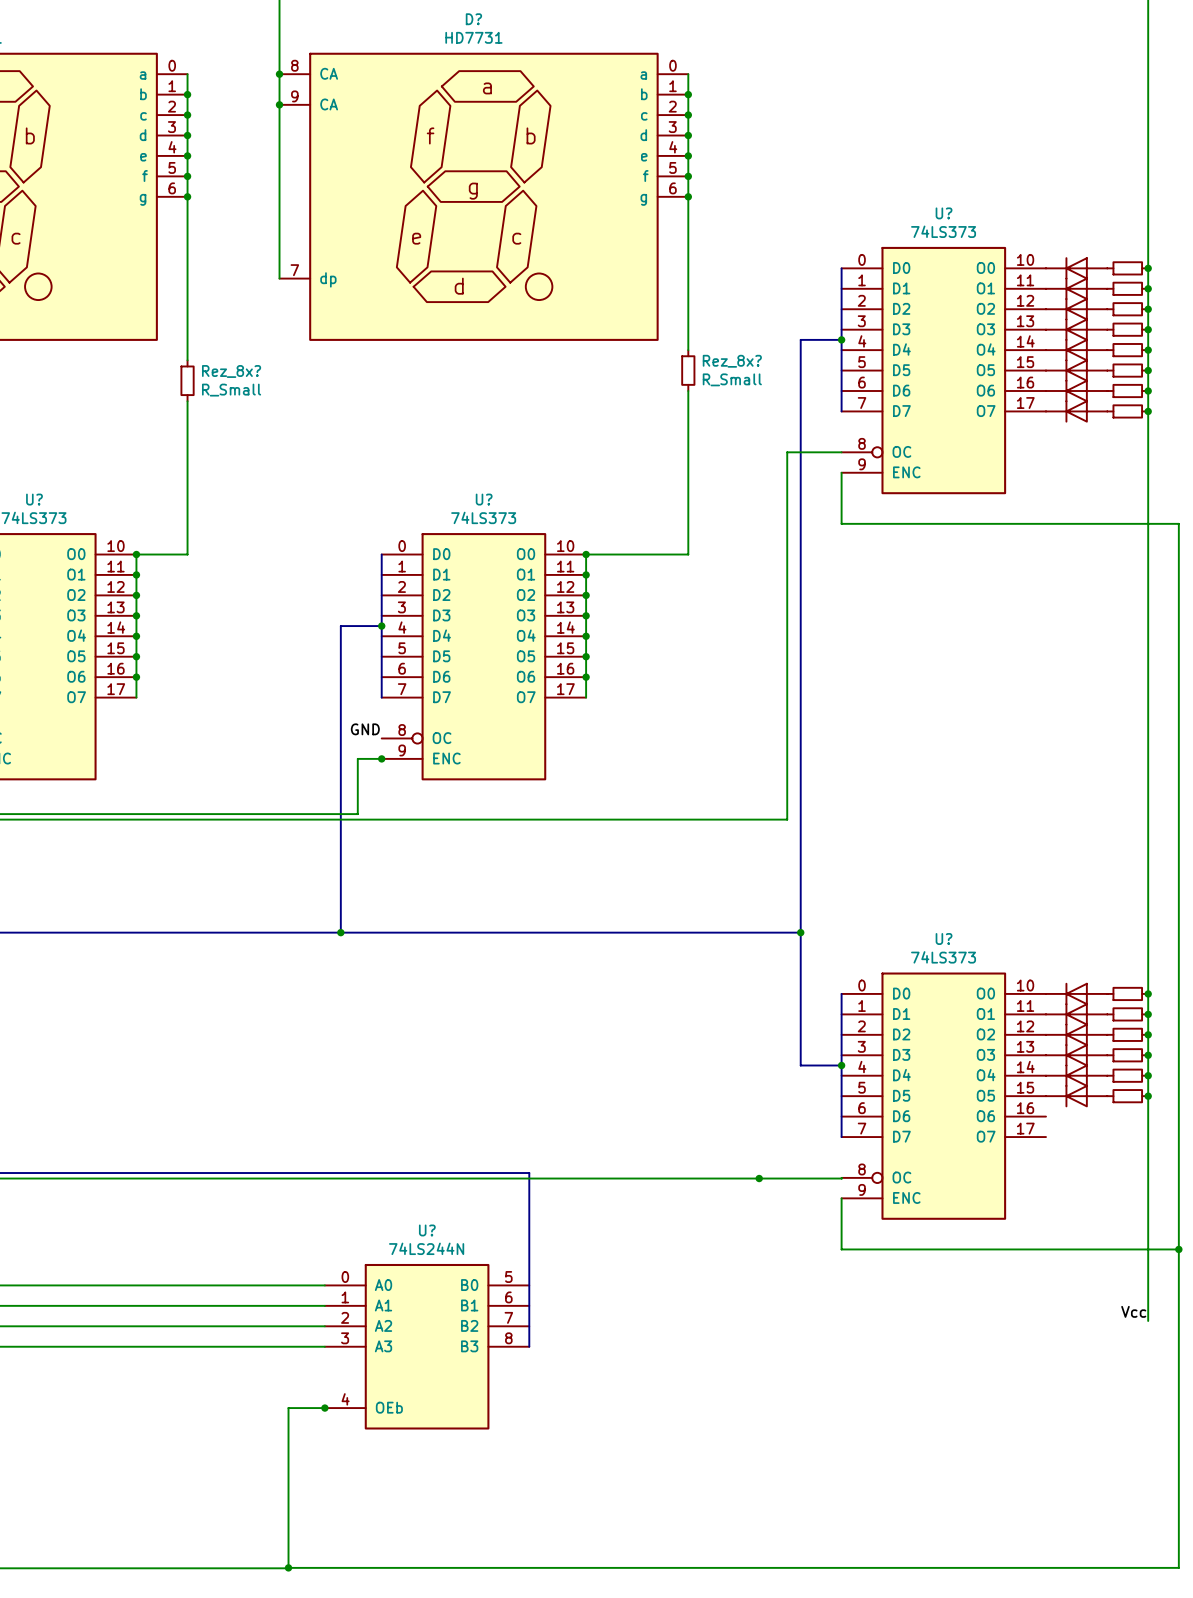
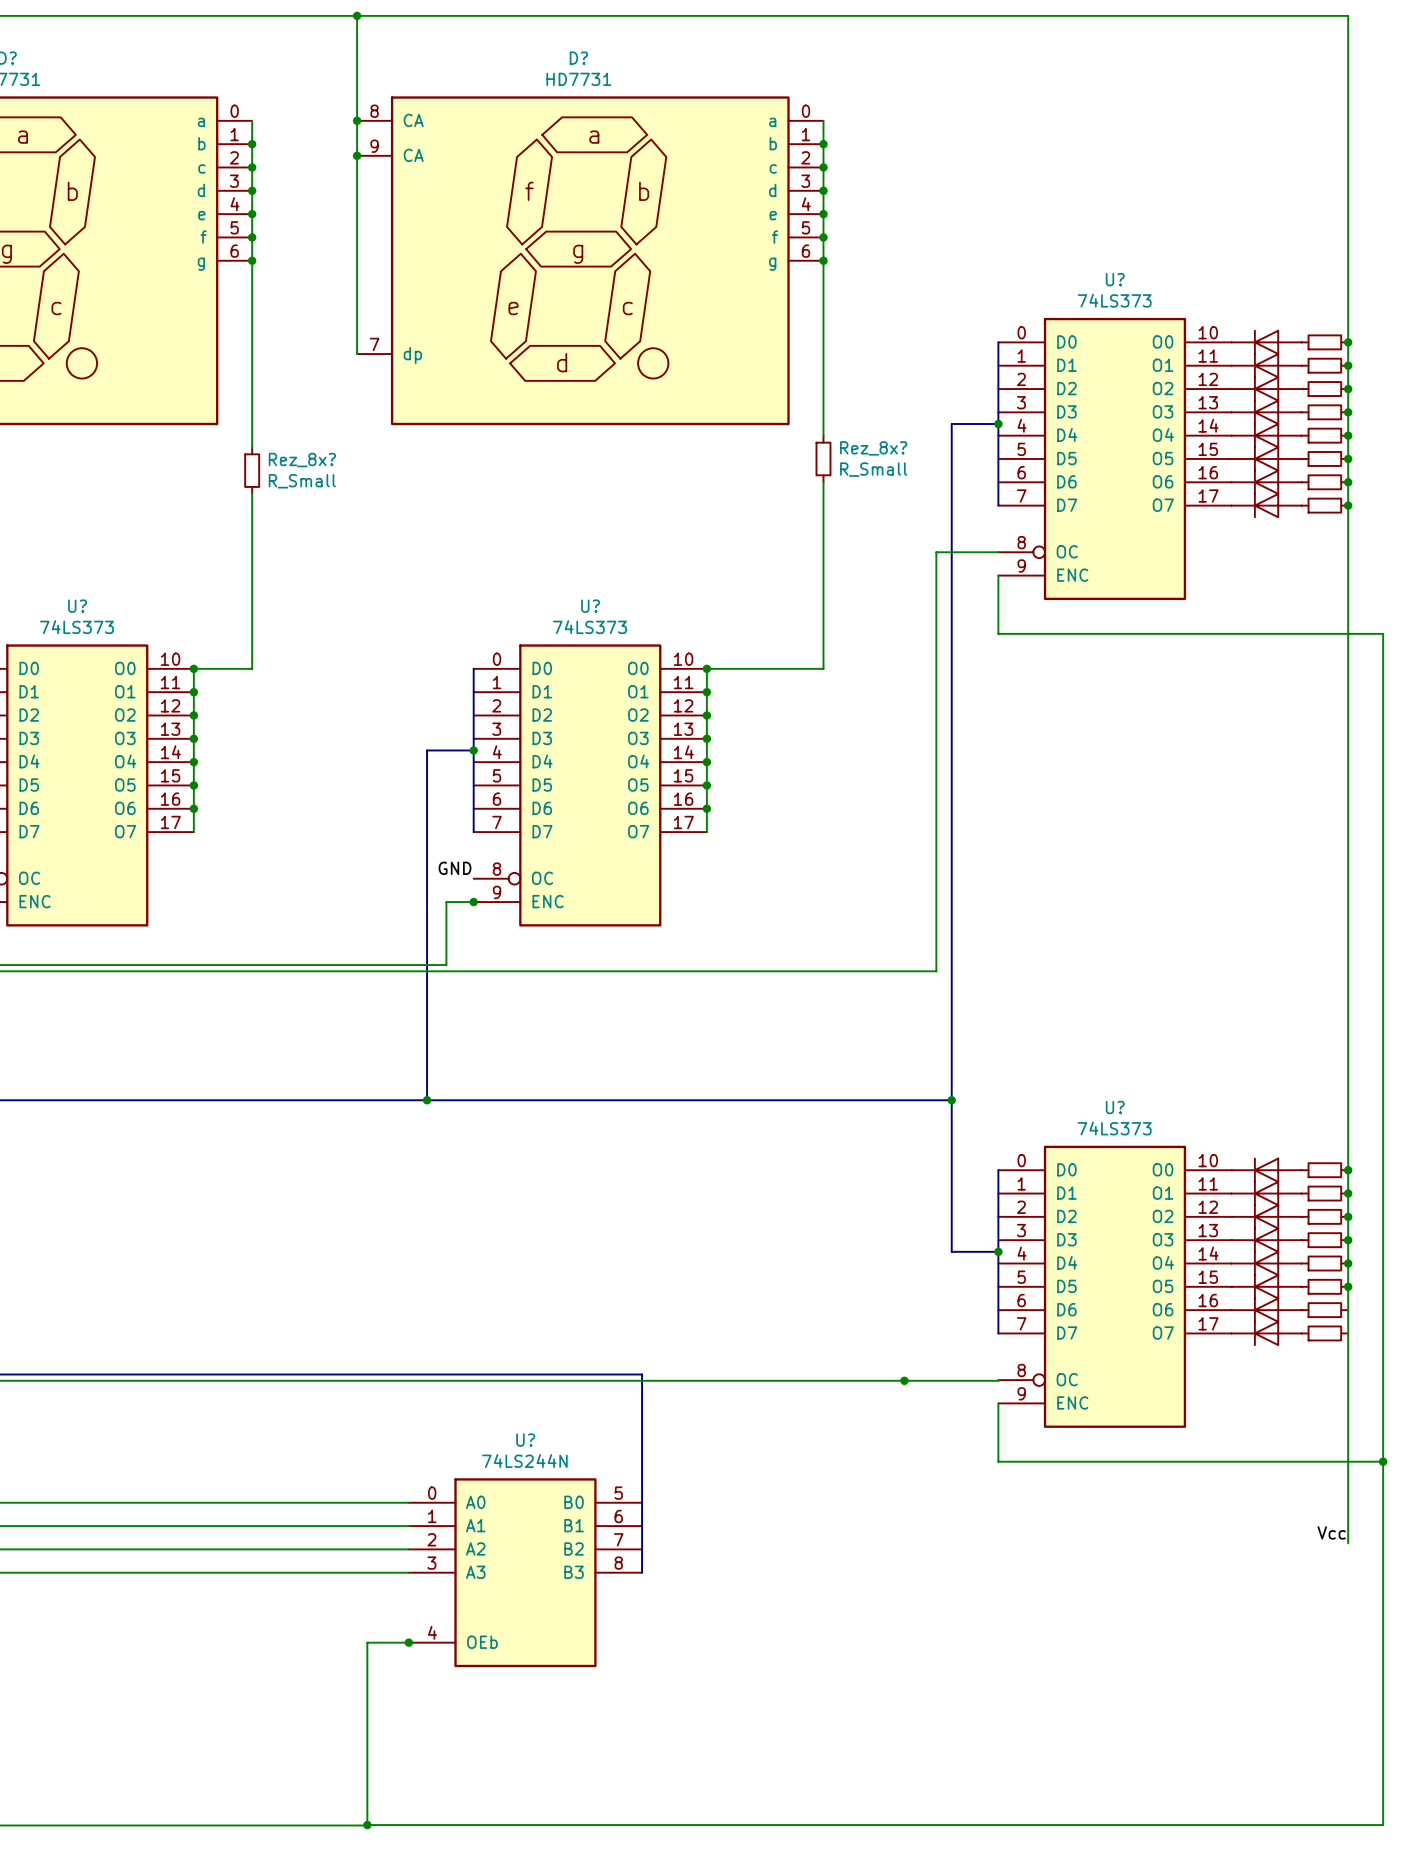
part: none -> (1266, 1310)
part: none -> (1324, 1310)
part: none -> (1266, 1333)
part: none -> (1324, 1333)

